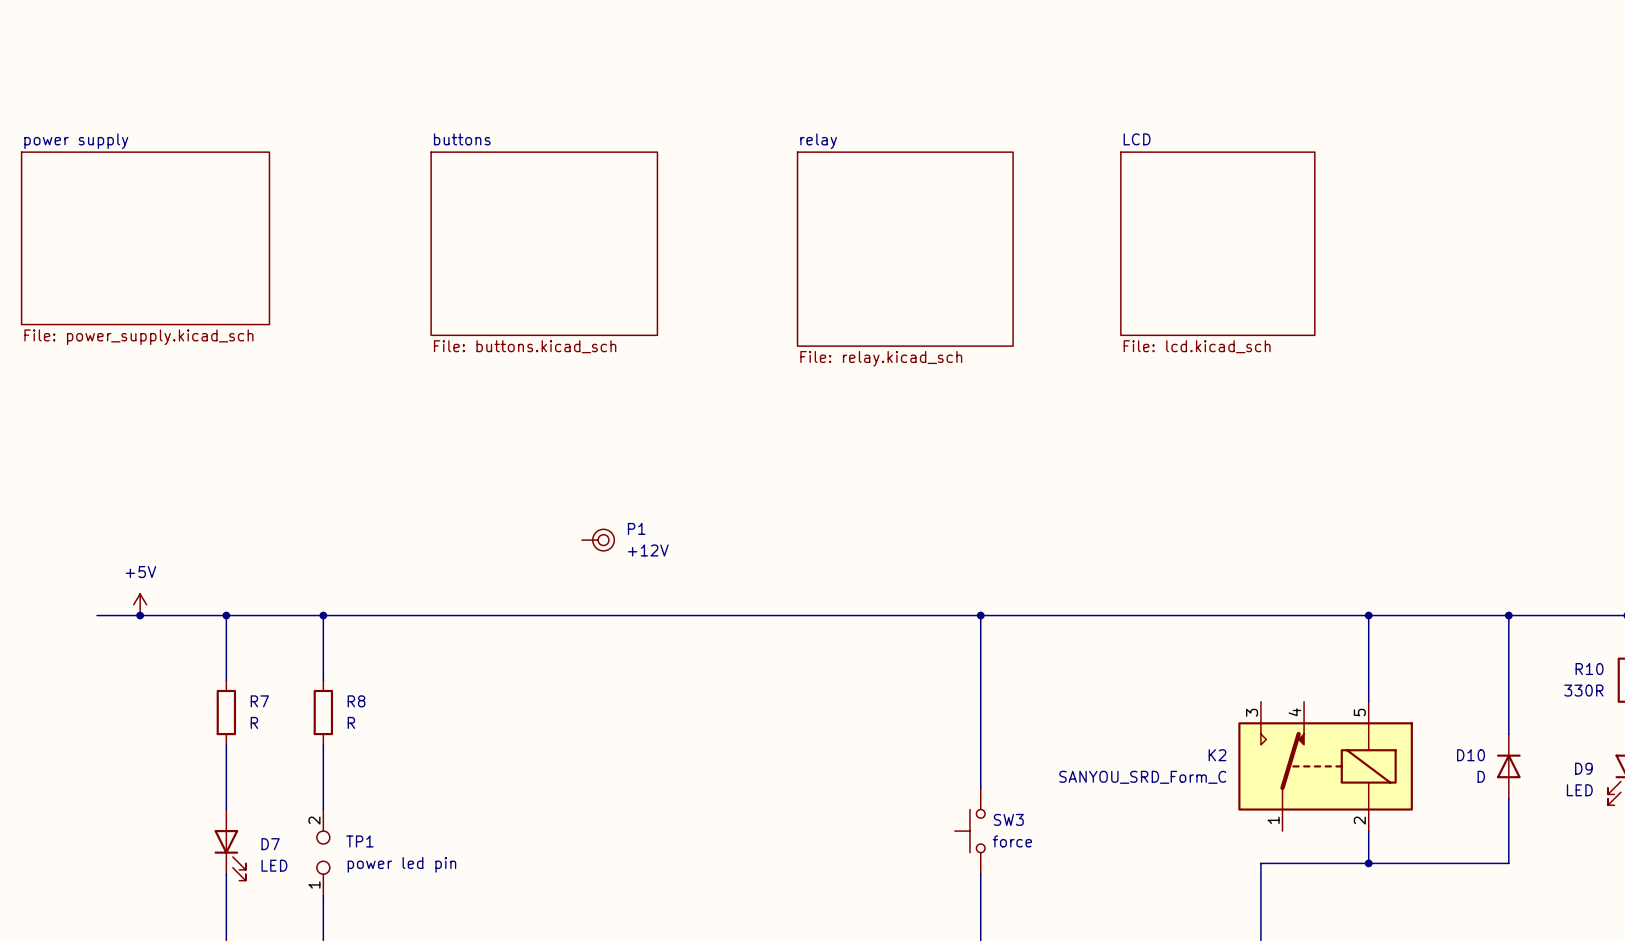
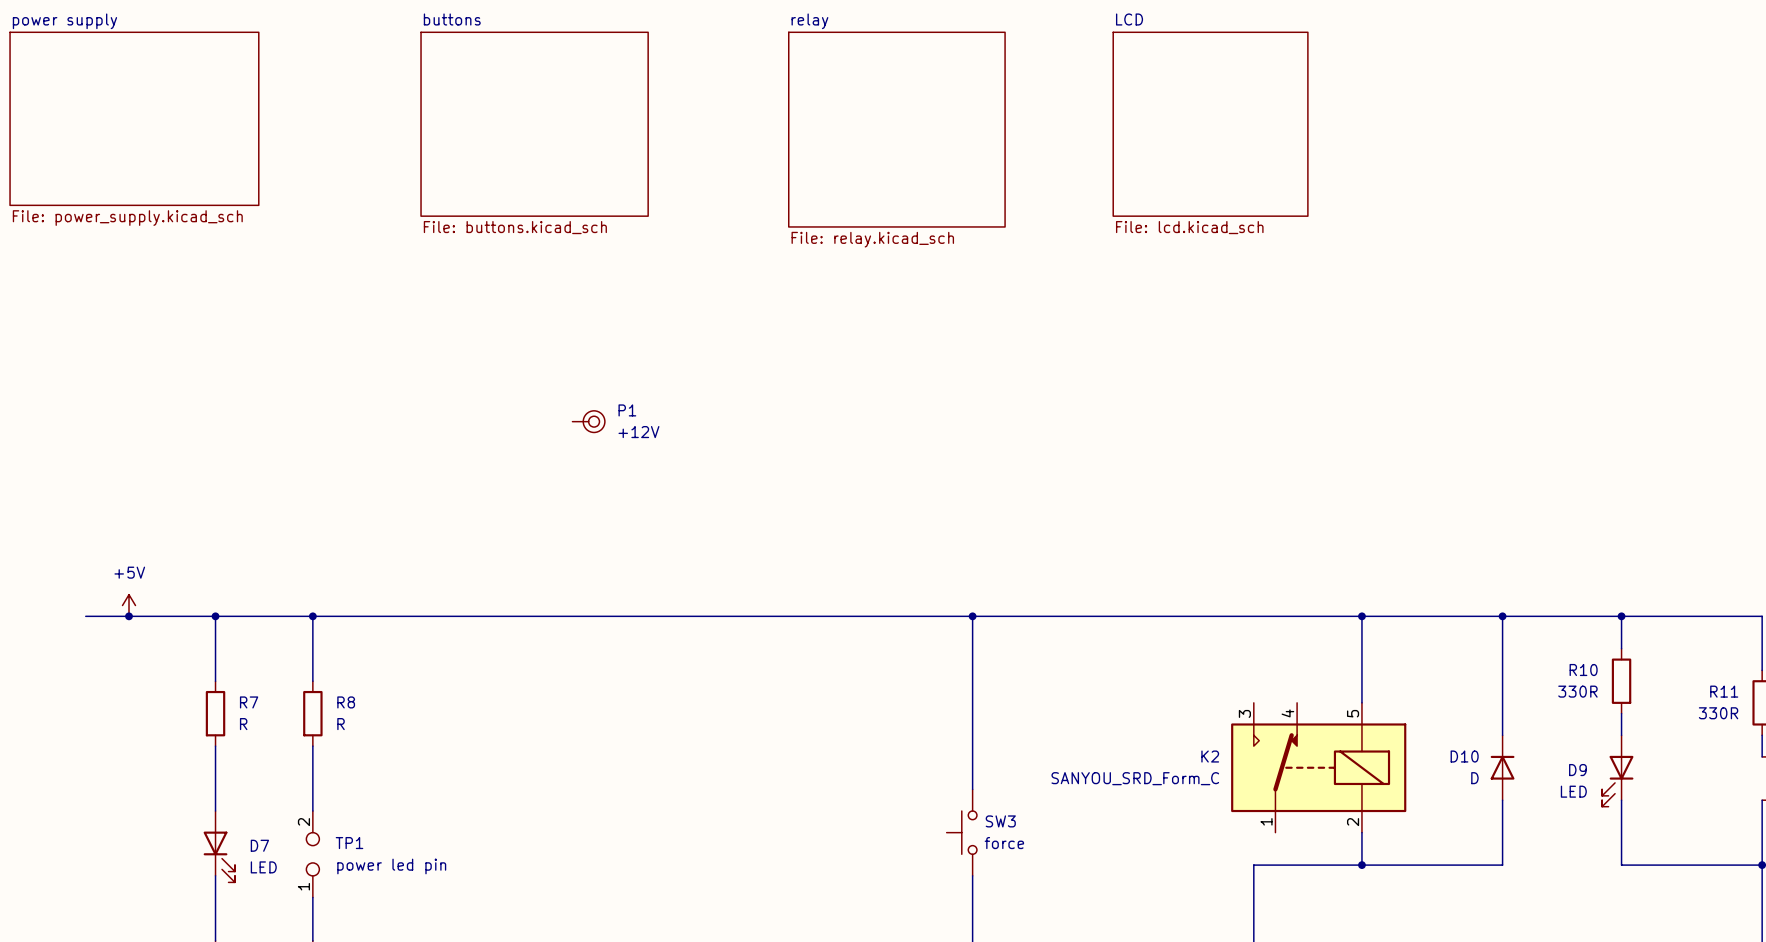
sheet power supply position: (145, 238) -> (134, 118)
sheet buttons position: (544, 243) -> (534, 124)
sheet LCD position: (1217, 243) -> (1210, 124)
sheet relay position: (905, 249) -> (896, 129)
P1 position: (598, 540) -> (588, 421)

